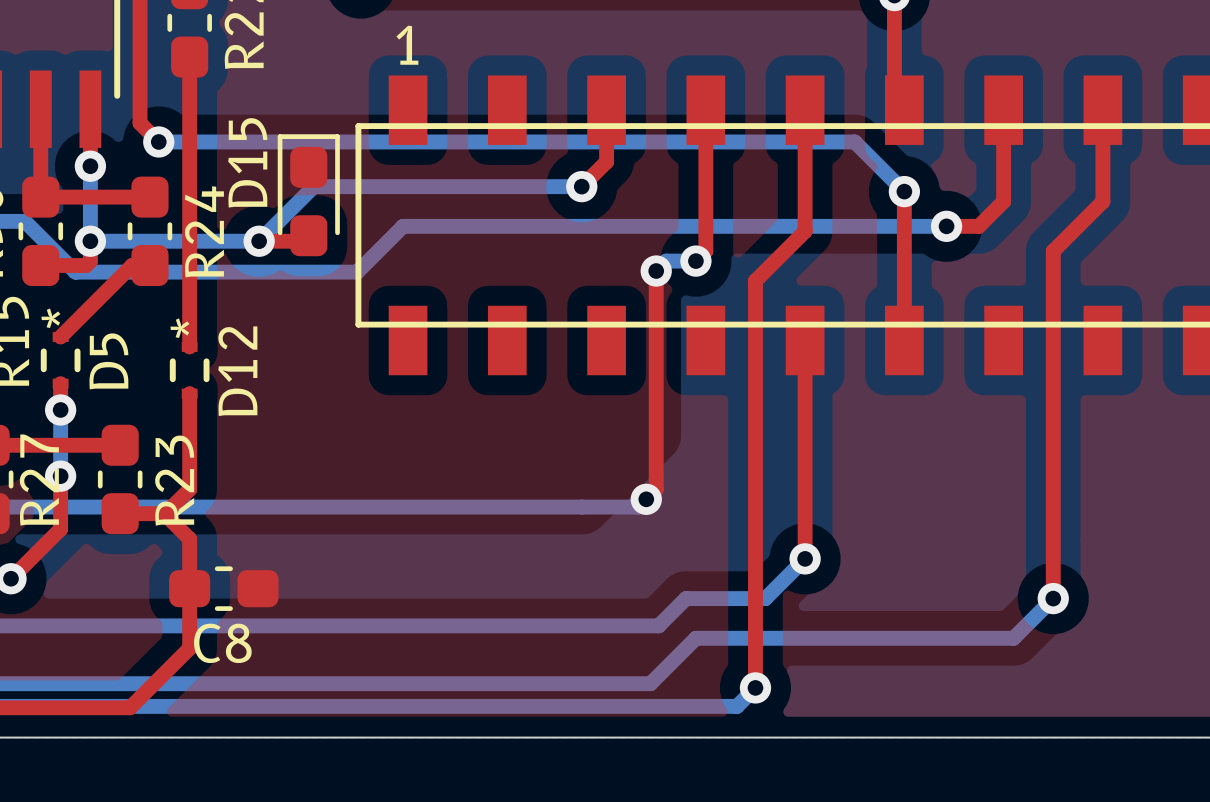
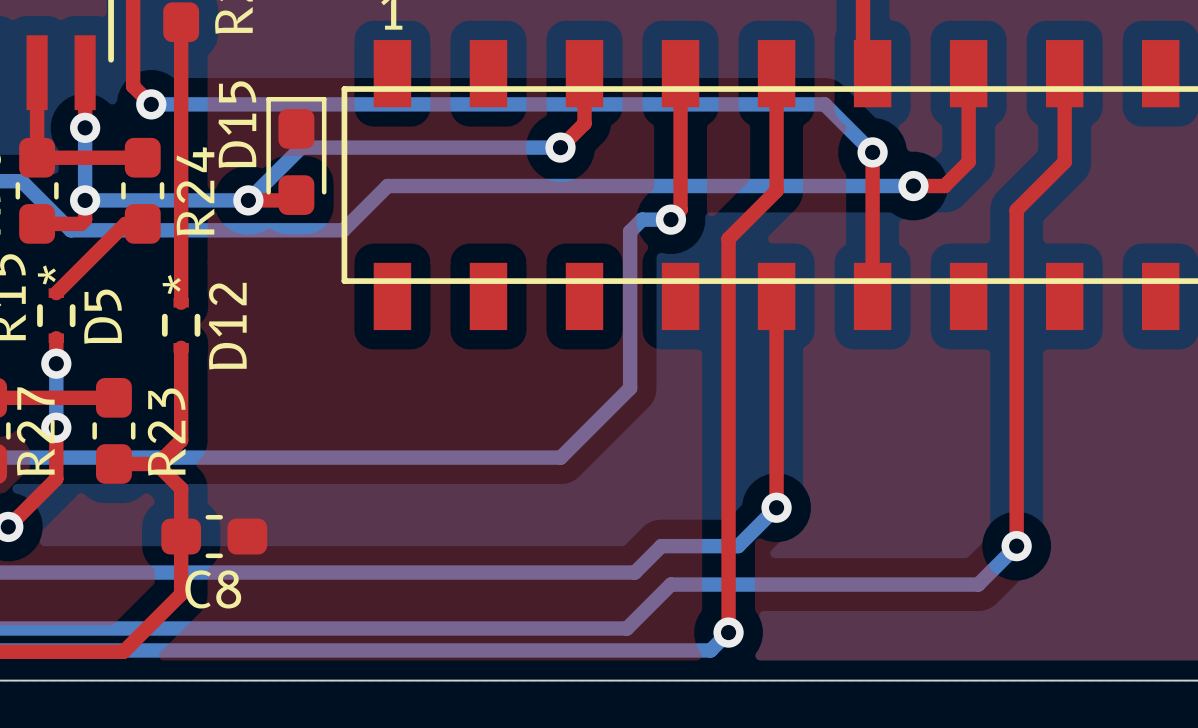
top track: (656, 271) (656, 489) (646, 499) -> none
via: (656, 271) -> none
bottom track: (646, 499) (638, 507) (582, 507) -> (632, 229) (630, 231) (630, 388) (560, 457)
via: (646, 499) -> none

